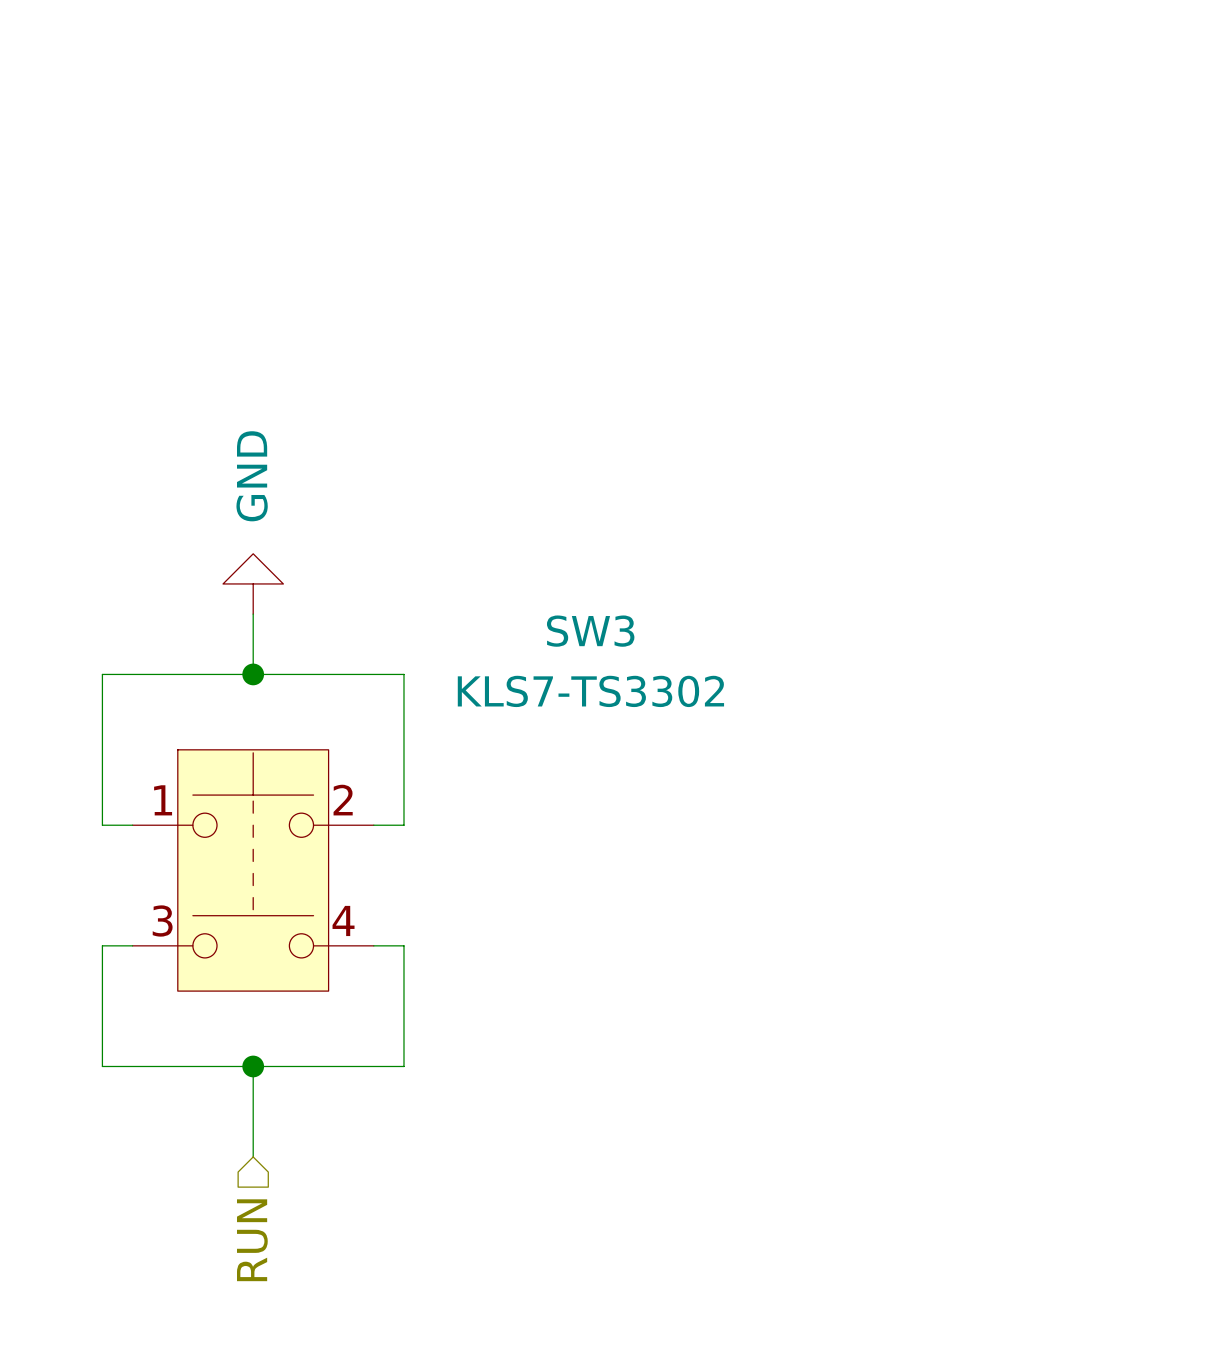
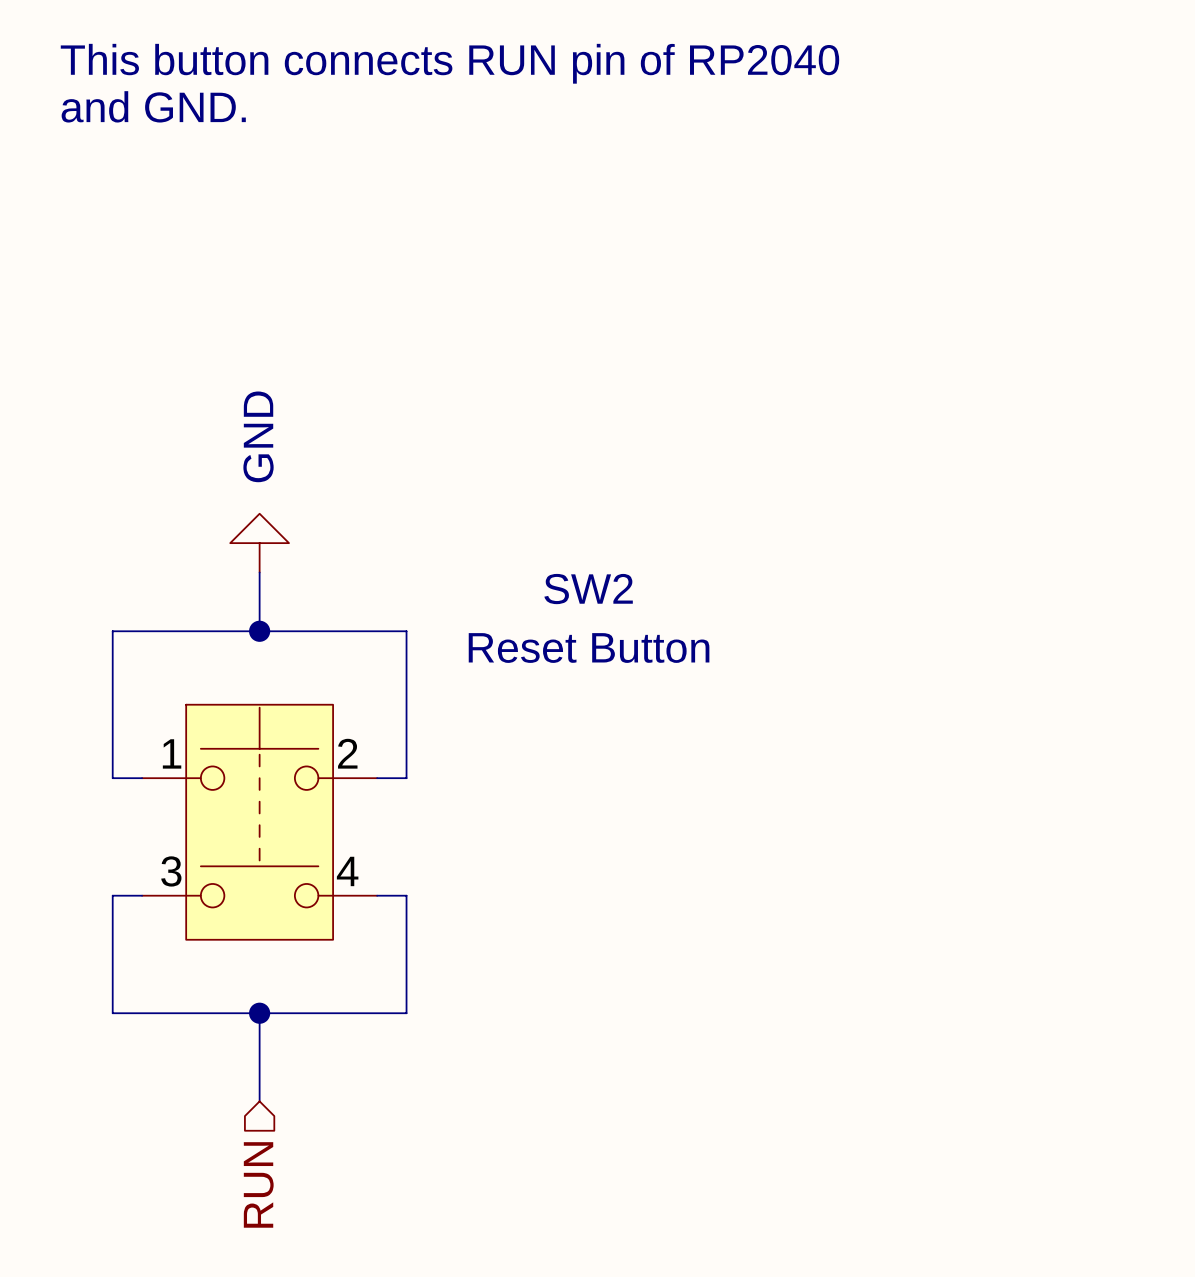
text: none -> This button connects RUN pin of RP2040 (449, 63)
text: none -> and GND. (153, 106)
SW3 name: SW3 (590, 631) -> SW2 (588, 589)
SW3 value: KLS7-TS3302 (590, 691) -> Reset Button (589, 648)

